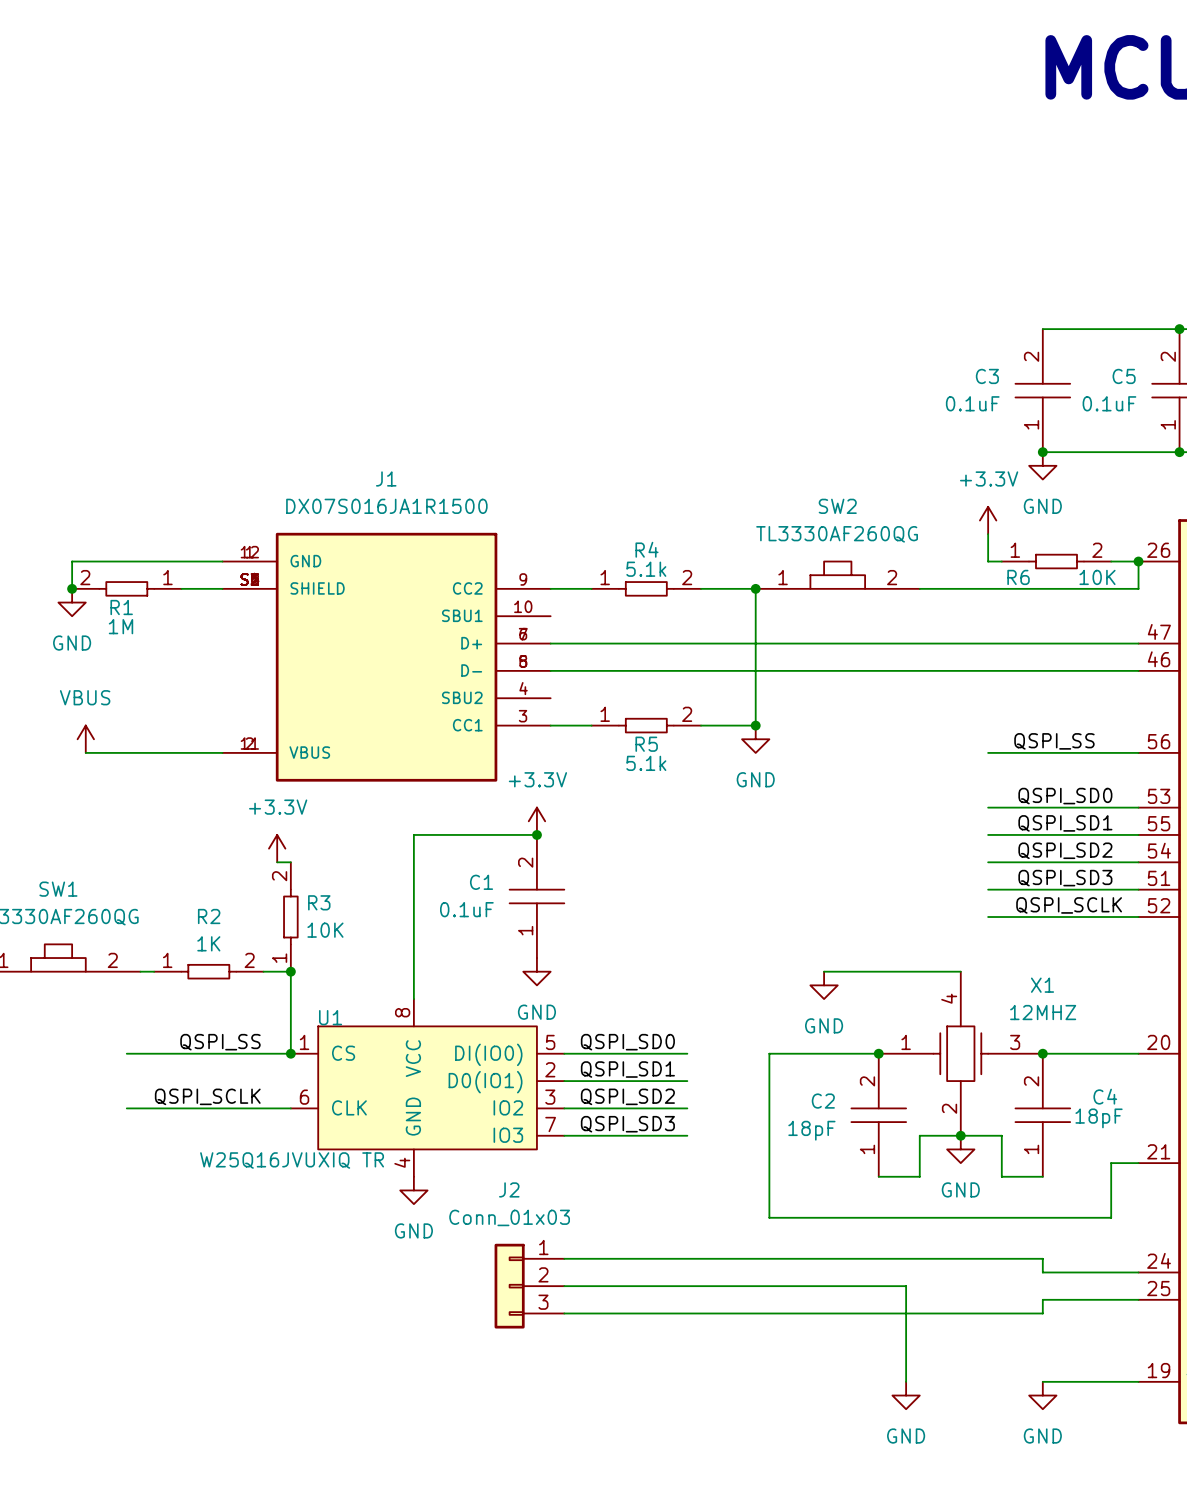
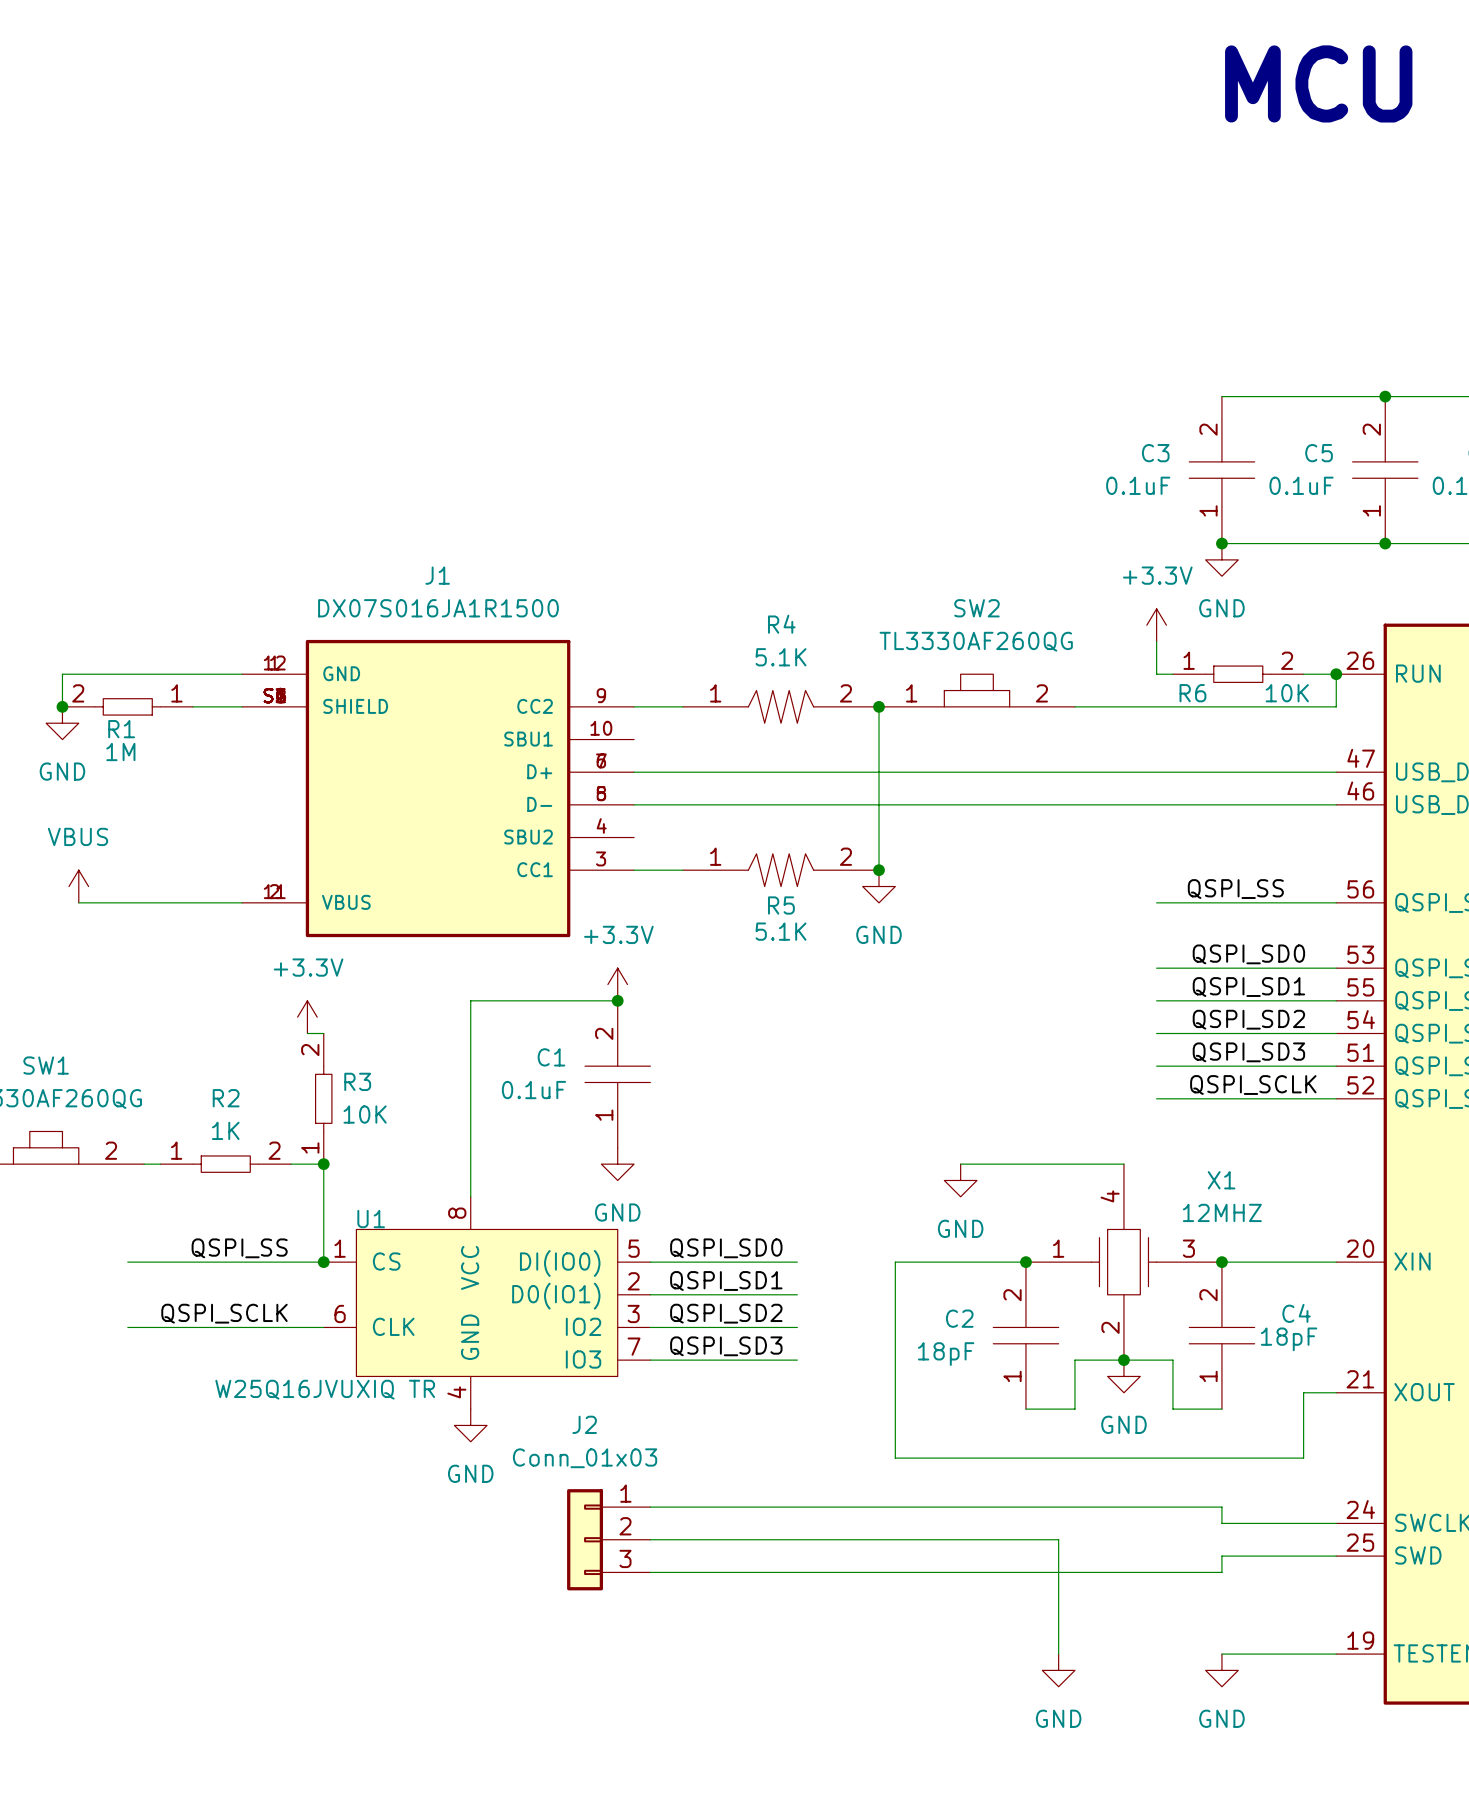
R4 name position: R4 (646, 549) -> R4 (781, 624)
R4 text: 5.1k (646, 569) -> 5.1K (781, 657)
R4 symbol: [591, 582, 702, 596] -> [683, 690, 880, 724]
R5 symbol: [591, 718, 702, 733] -> [683, 853, 880, 887]
R5 text: 5.1k (646, 763) -> 5.1K (781, 931)

